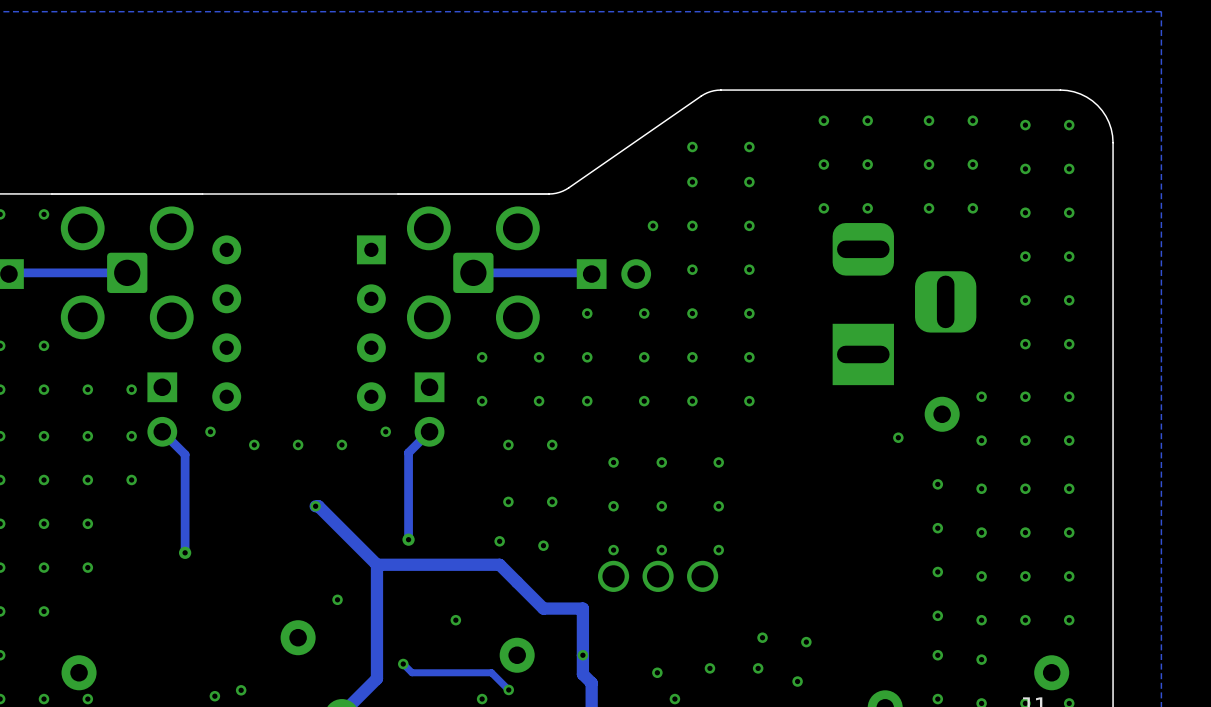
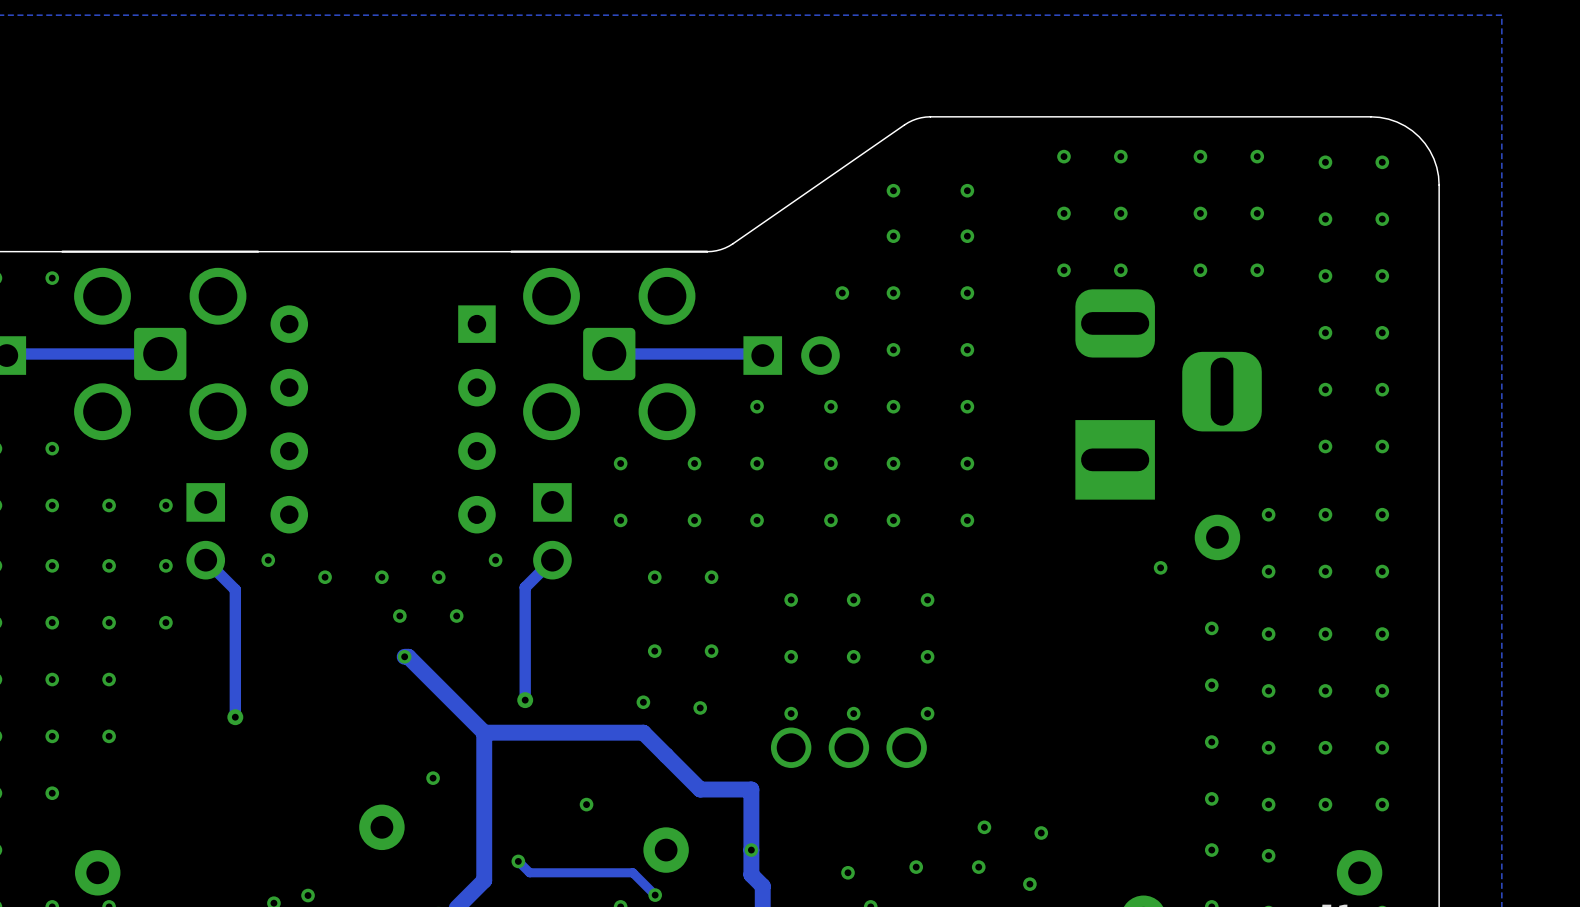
via: none -> (399, 616)
via: none -> (456, 616)

